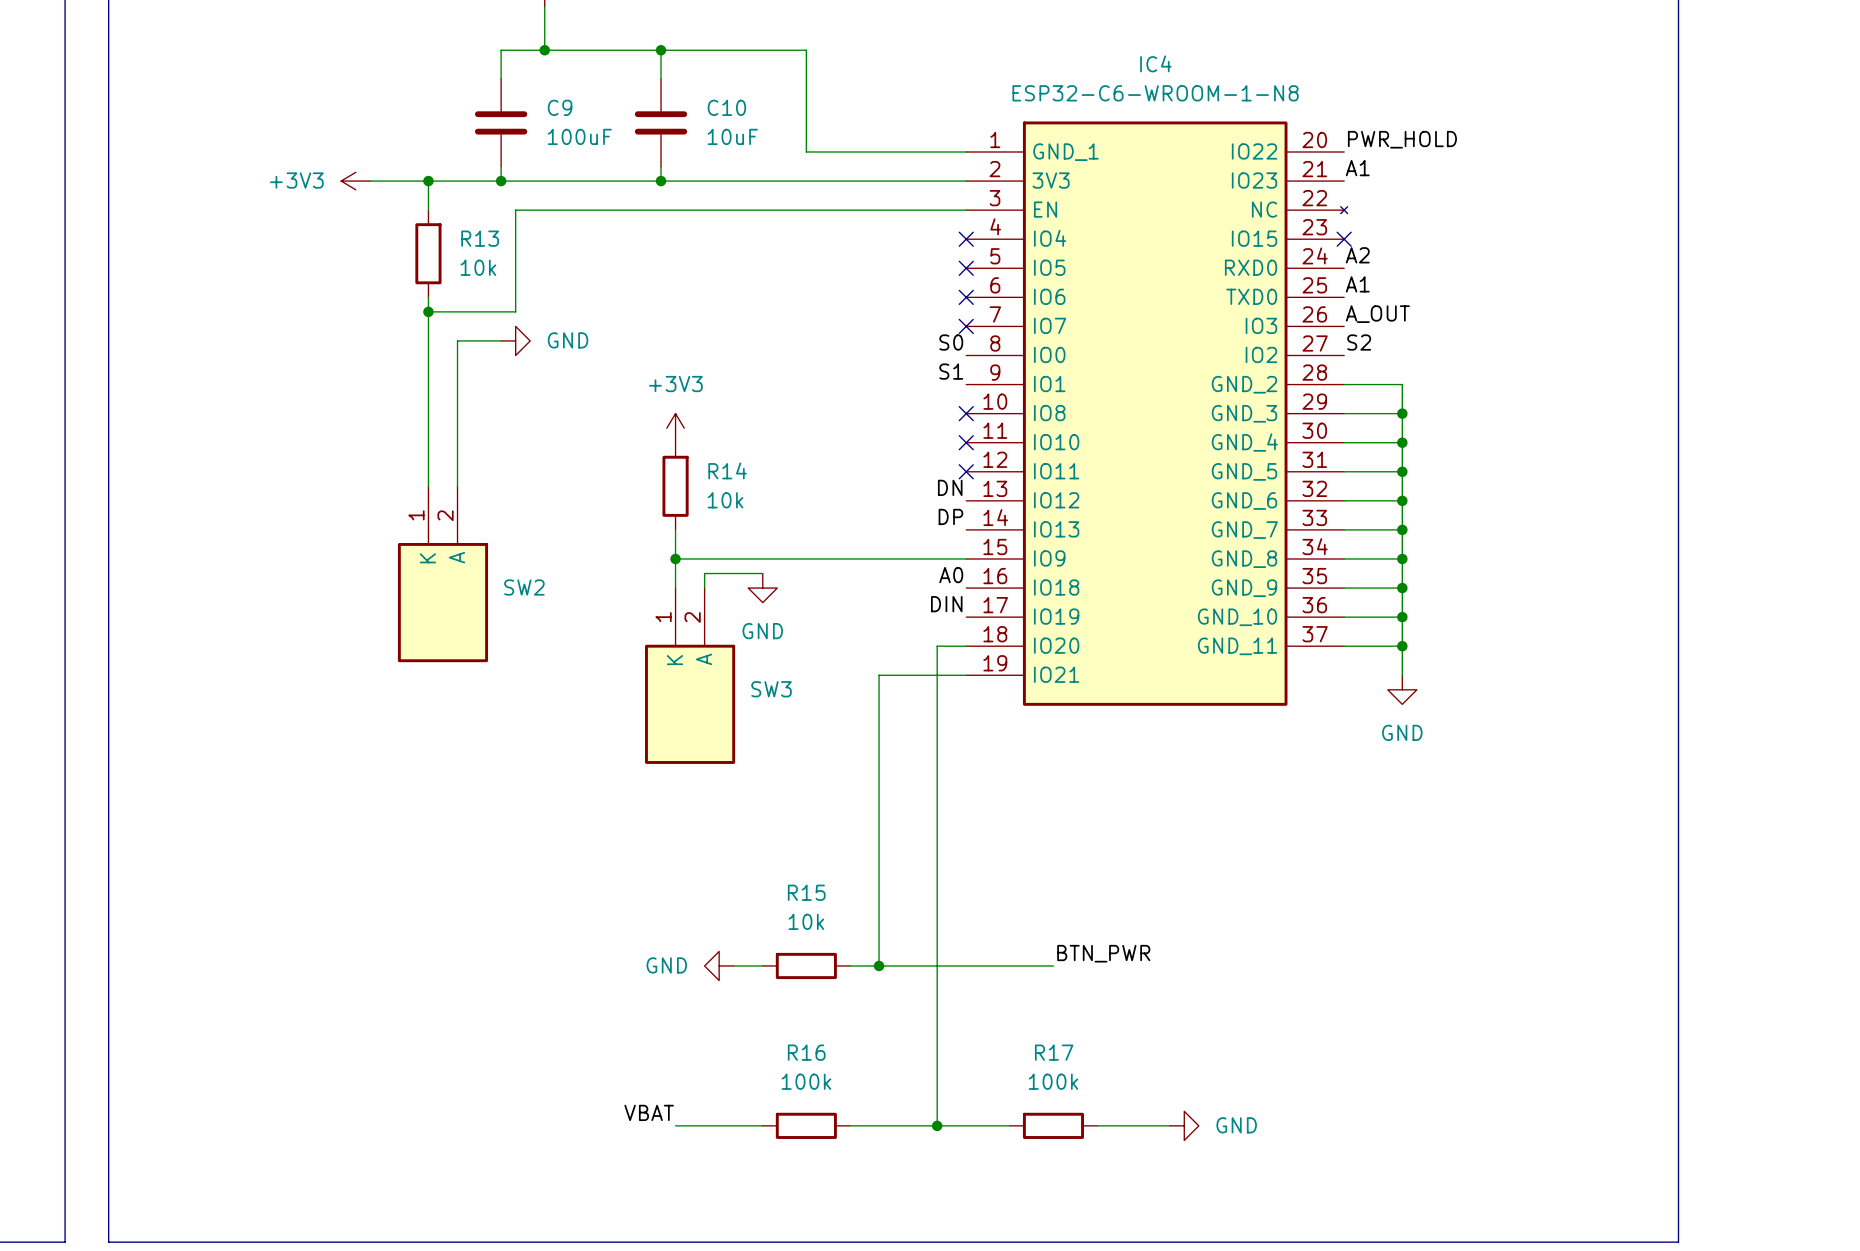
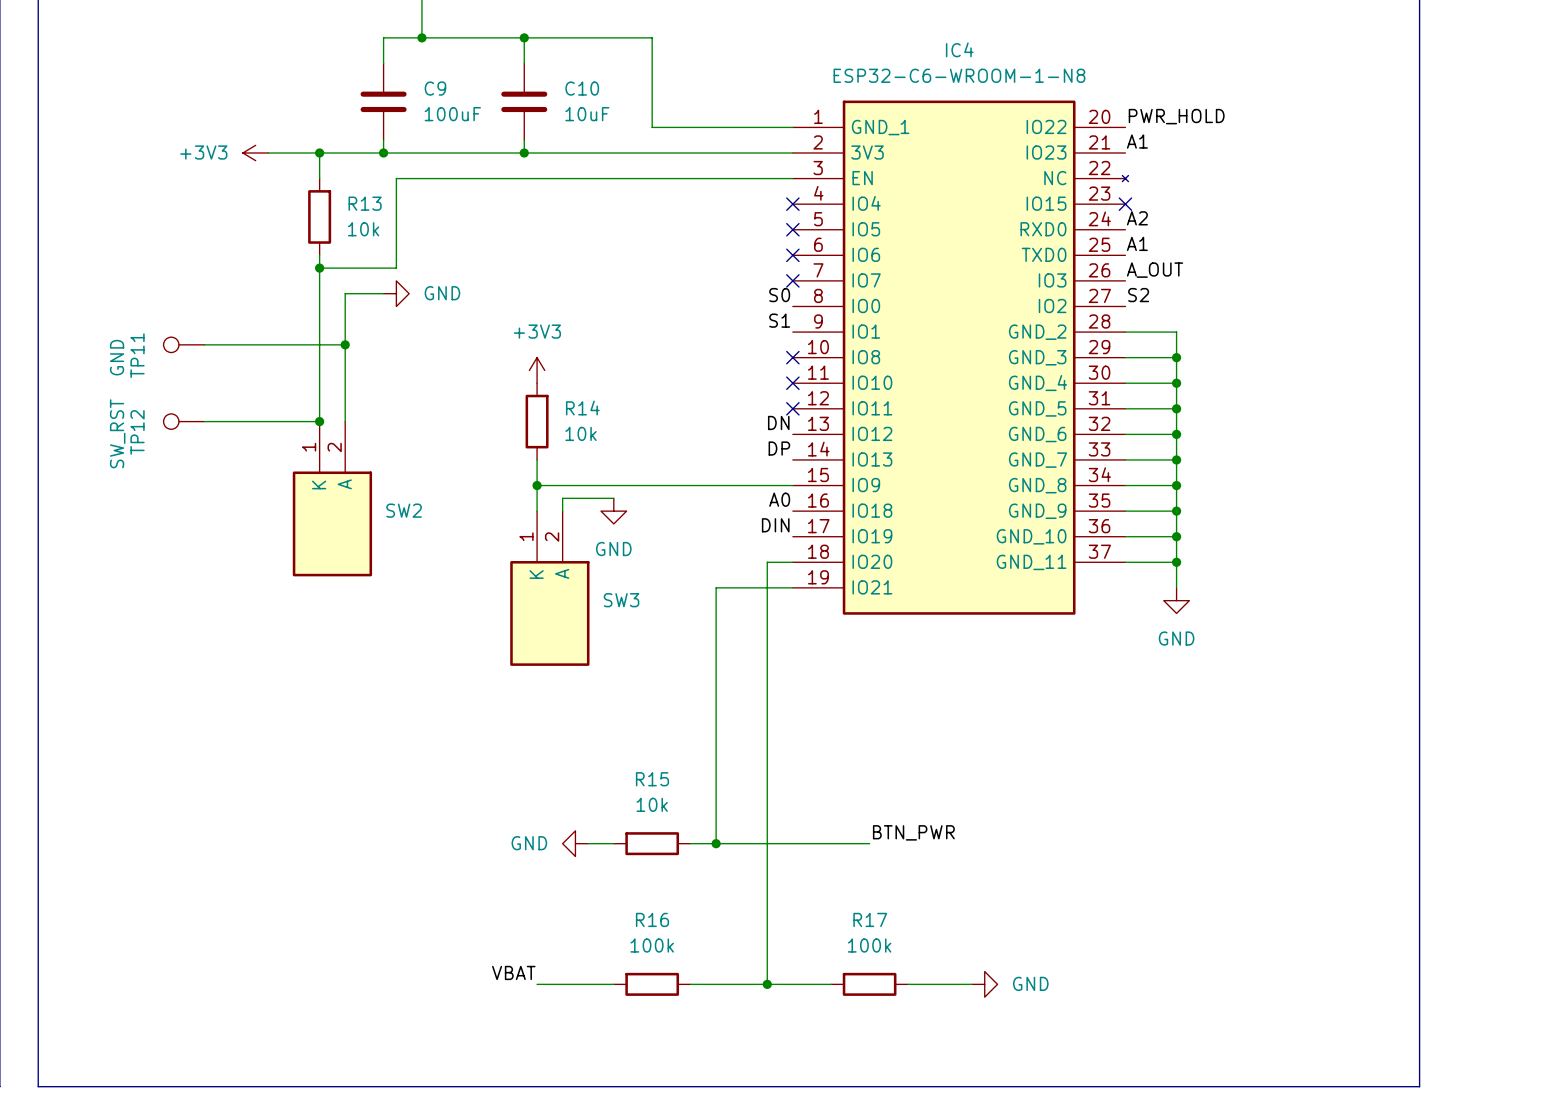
TP11: none -> GND (184, 344)
wire: none -> (204, 344) (345, 344)
junction: none -> (345, 344)
TP12: none -> SW_RST (184, 421)
wire: none -> (204, 421) (319, 421)
junction: none -> (319, 421)

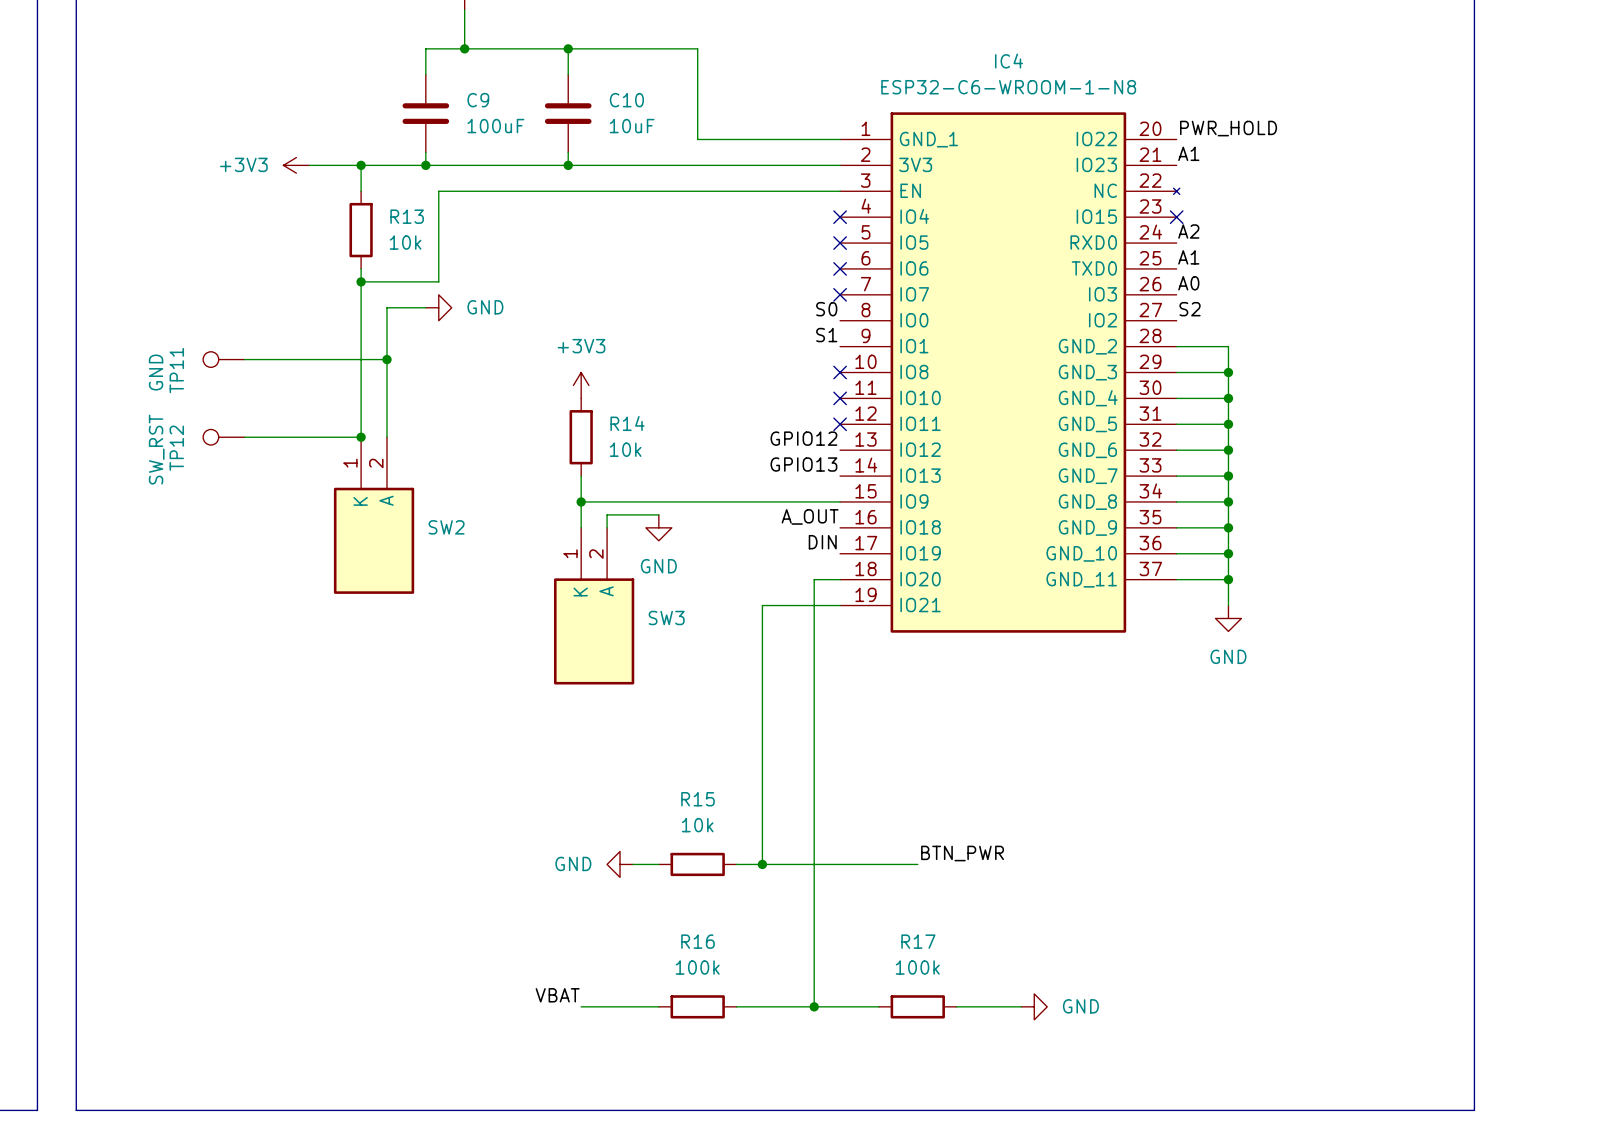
label: A_OUT (1155, 270) -> A0 (1188, 283)
label: DN (778, 422) -> GPIO12 (803, 438)
label: DP (779, 448) -> GPIO13 (803, 464)
label: A0 (779, 499) -> A_OUT (810, 516)

